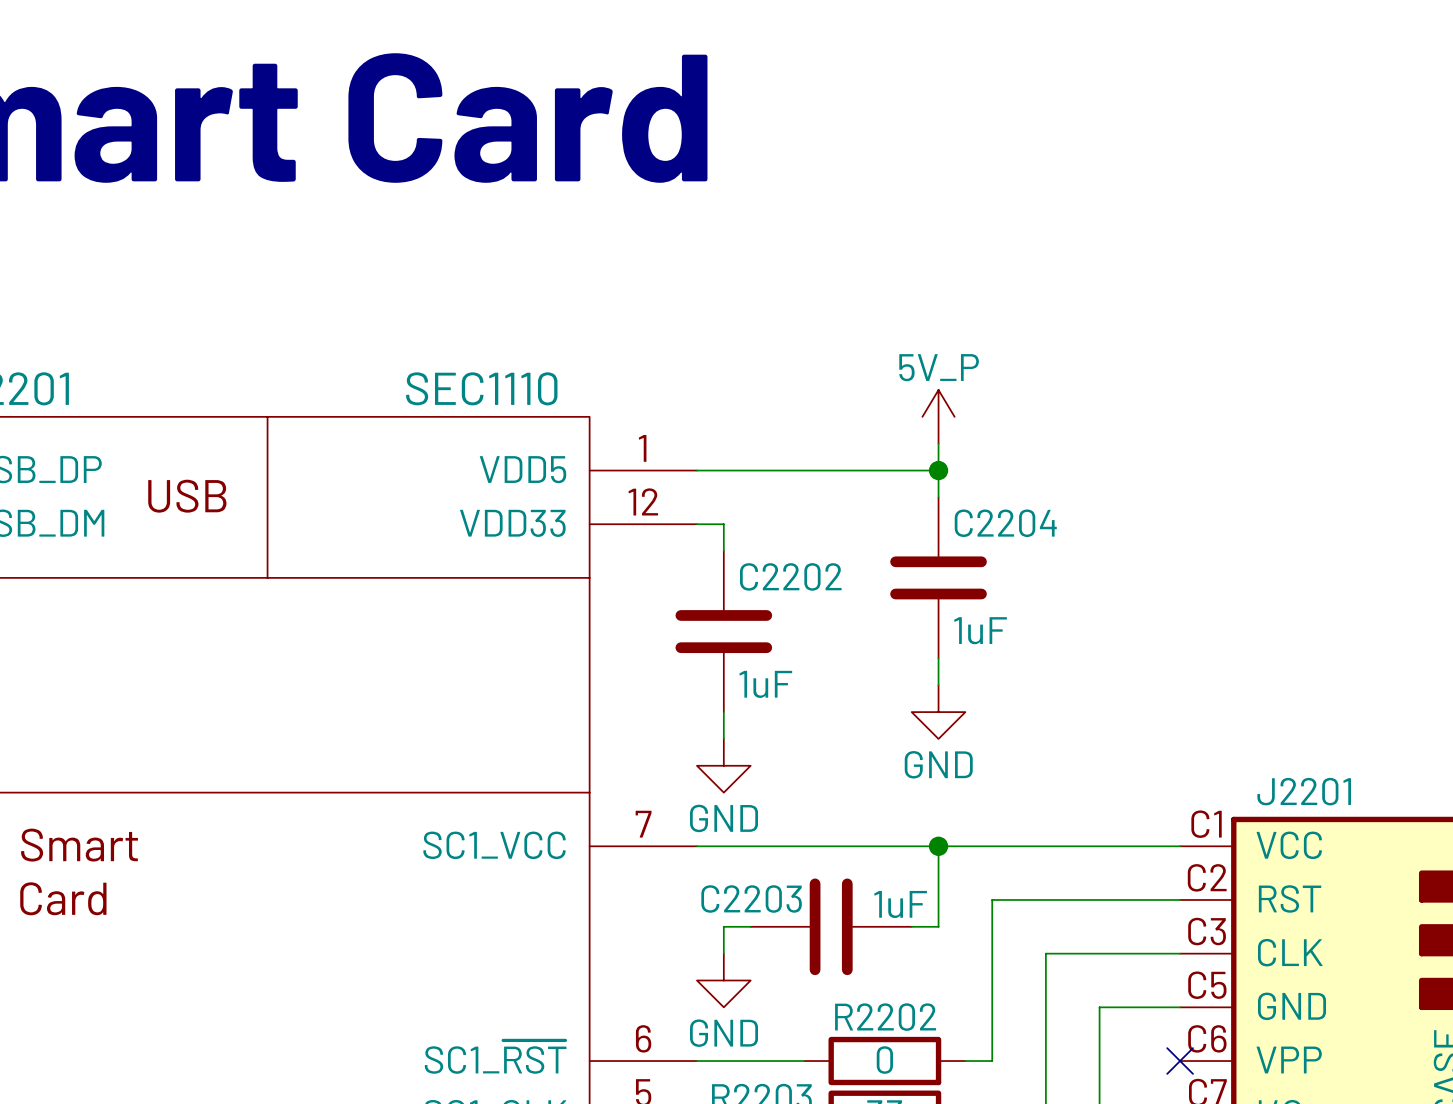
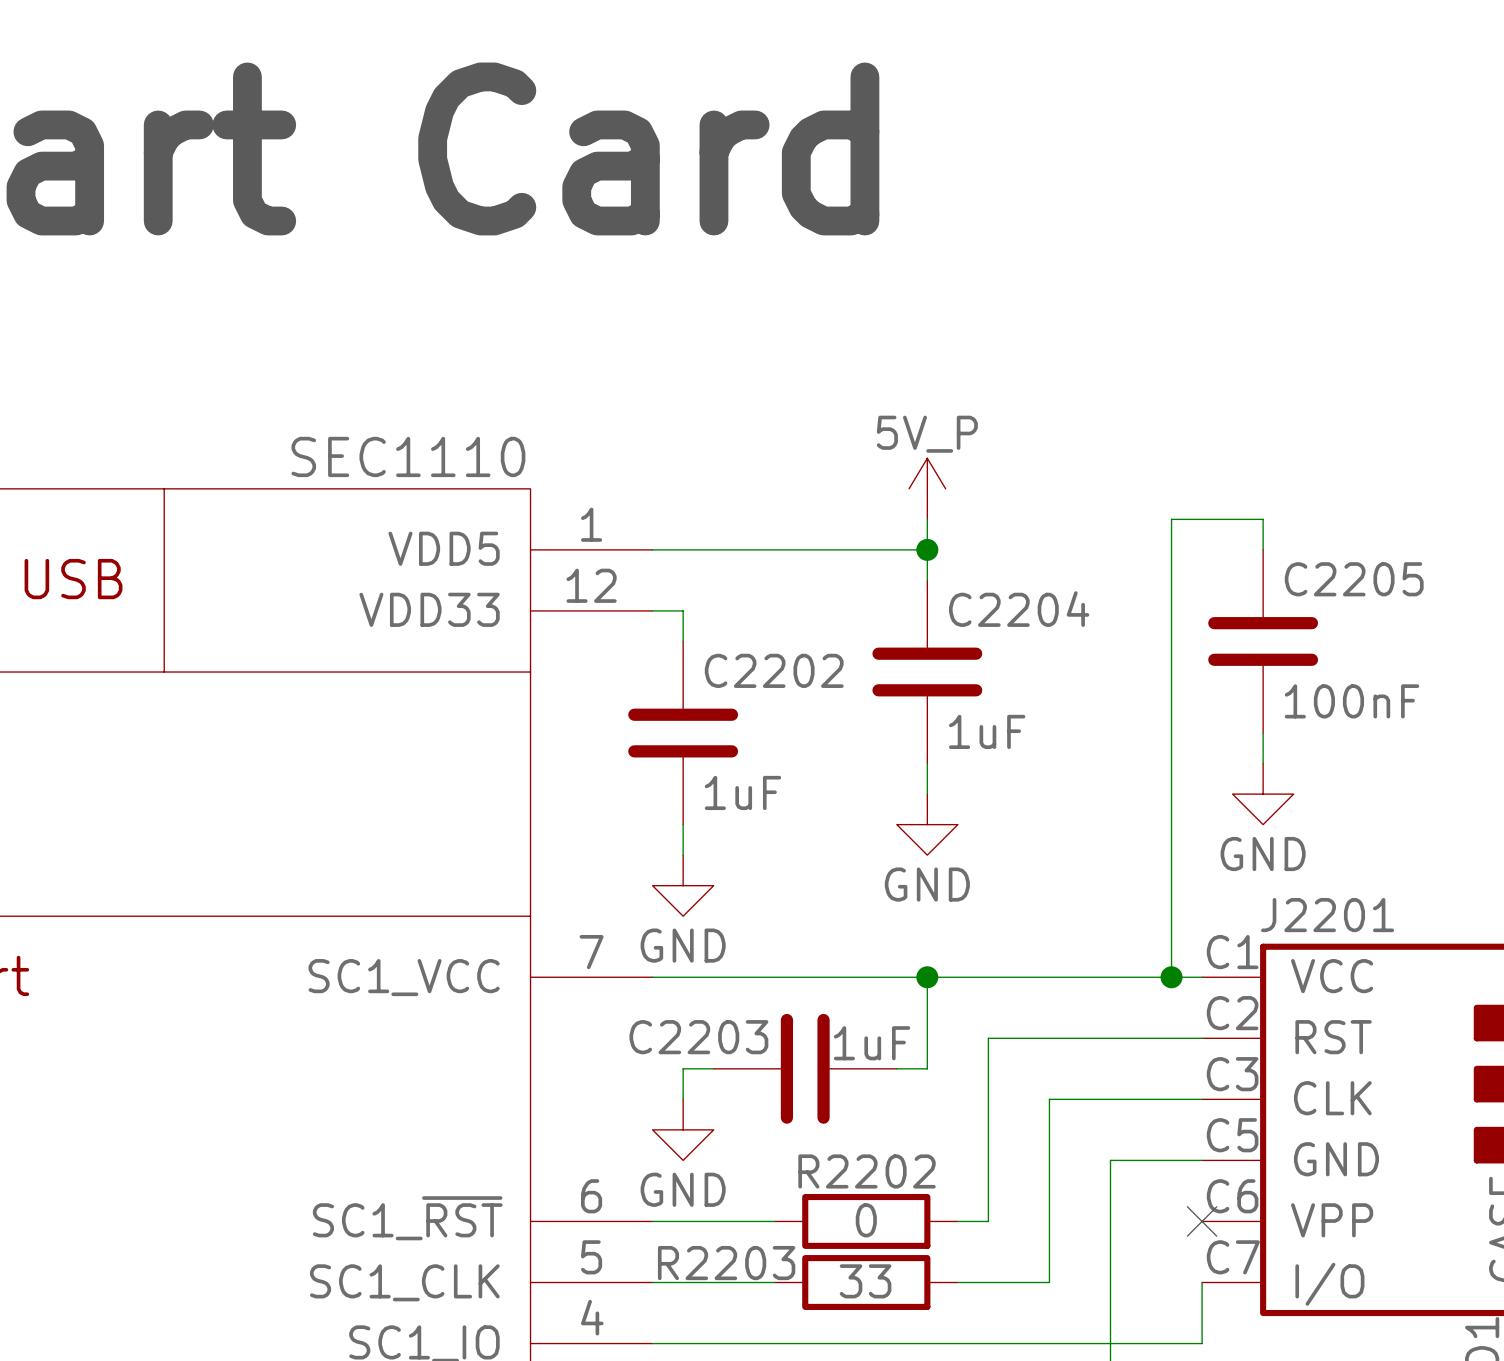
wire: none -> (1263, 549) (1263, 519) (1171, 519) (1171, 977)
C2205: none -> 100nF (1263, 641)
wire: none -> (1263, 733) (1263, 763)
power symbol: none -> GND (1263, 794)
junction: none -> (1171, 977)

